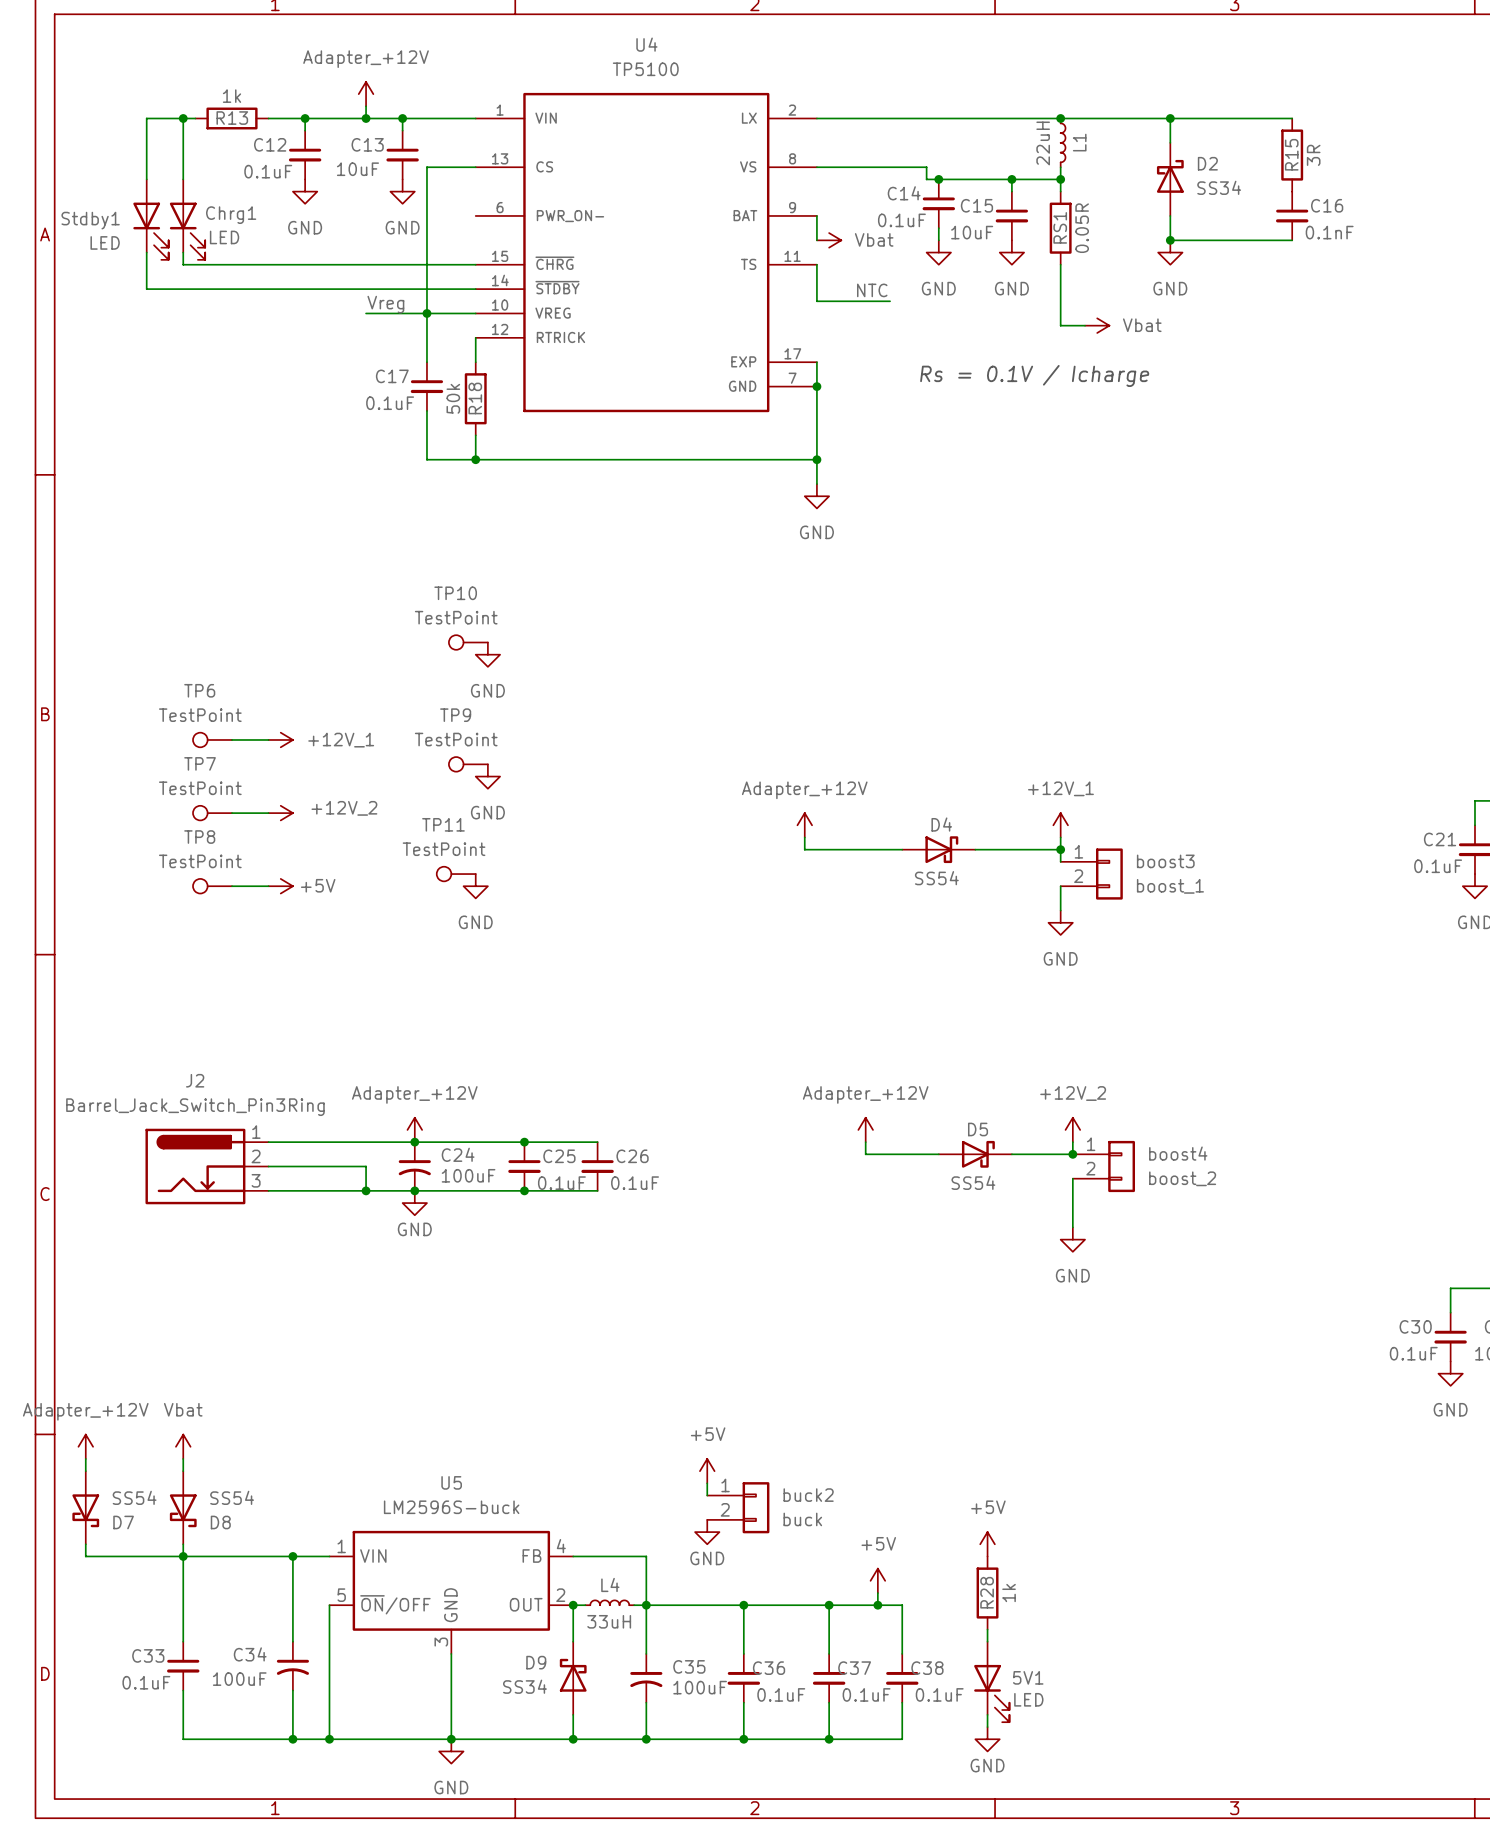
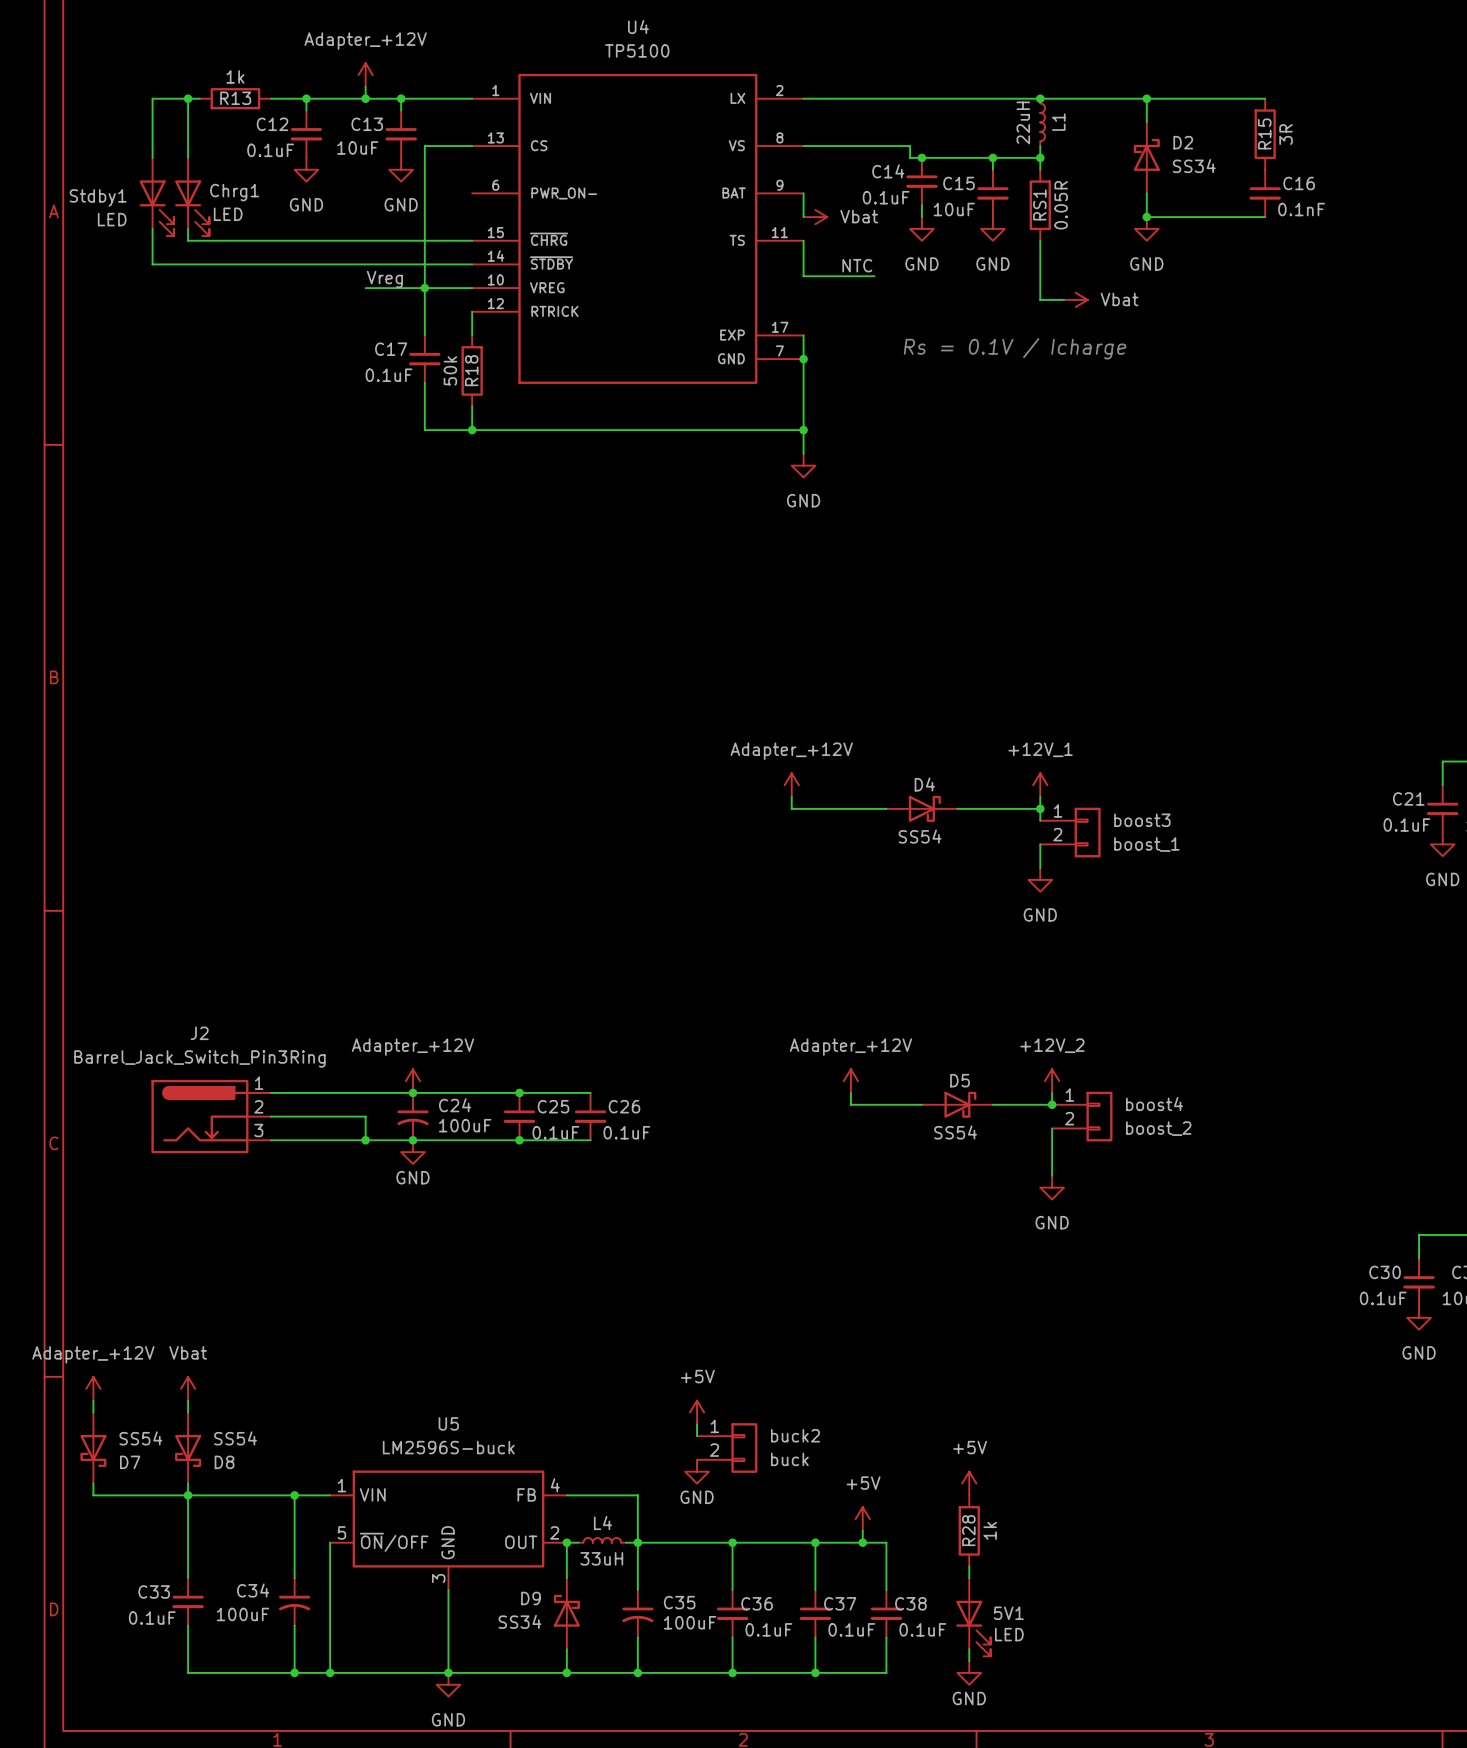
TP10: TestPoint (468, 642) -> none
power symbol: GND (487, 654) -> none
TP6: TestPoint (212, 739) -> none
wire: (232, 739) (268, 739) -> none
power symbol: +12V_1 (280, 739) -> none
TP9: TestPoint (468, 764) -> none
power symbol: GND (487, 776) -> none
TP7: TestPoint (212, 813) -> none
wire: (232, 813) (268, 813) -> none
power symbol: +12V_2 (280, 813) -> none
TP11: TestPoint (456, 874) -> none
TP8: TestPoint (212, 886) -> none
wire: (232, 886) (268, 886) -> none
power symbol: +5V (280, 886) -> none
power symbol: GND (475, 886) -> none

